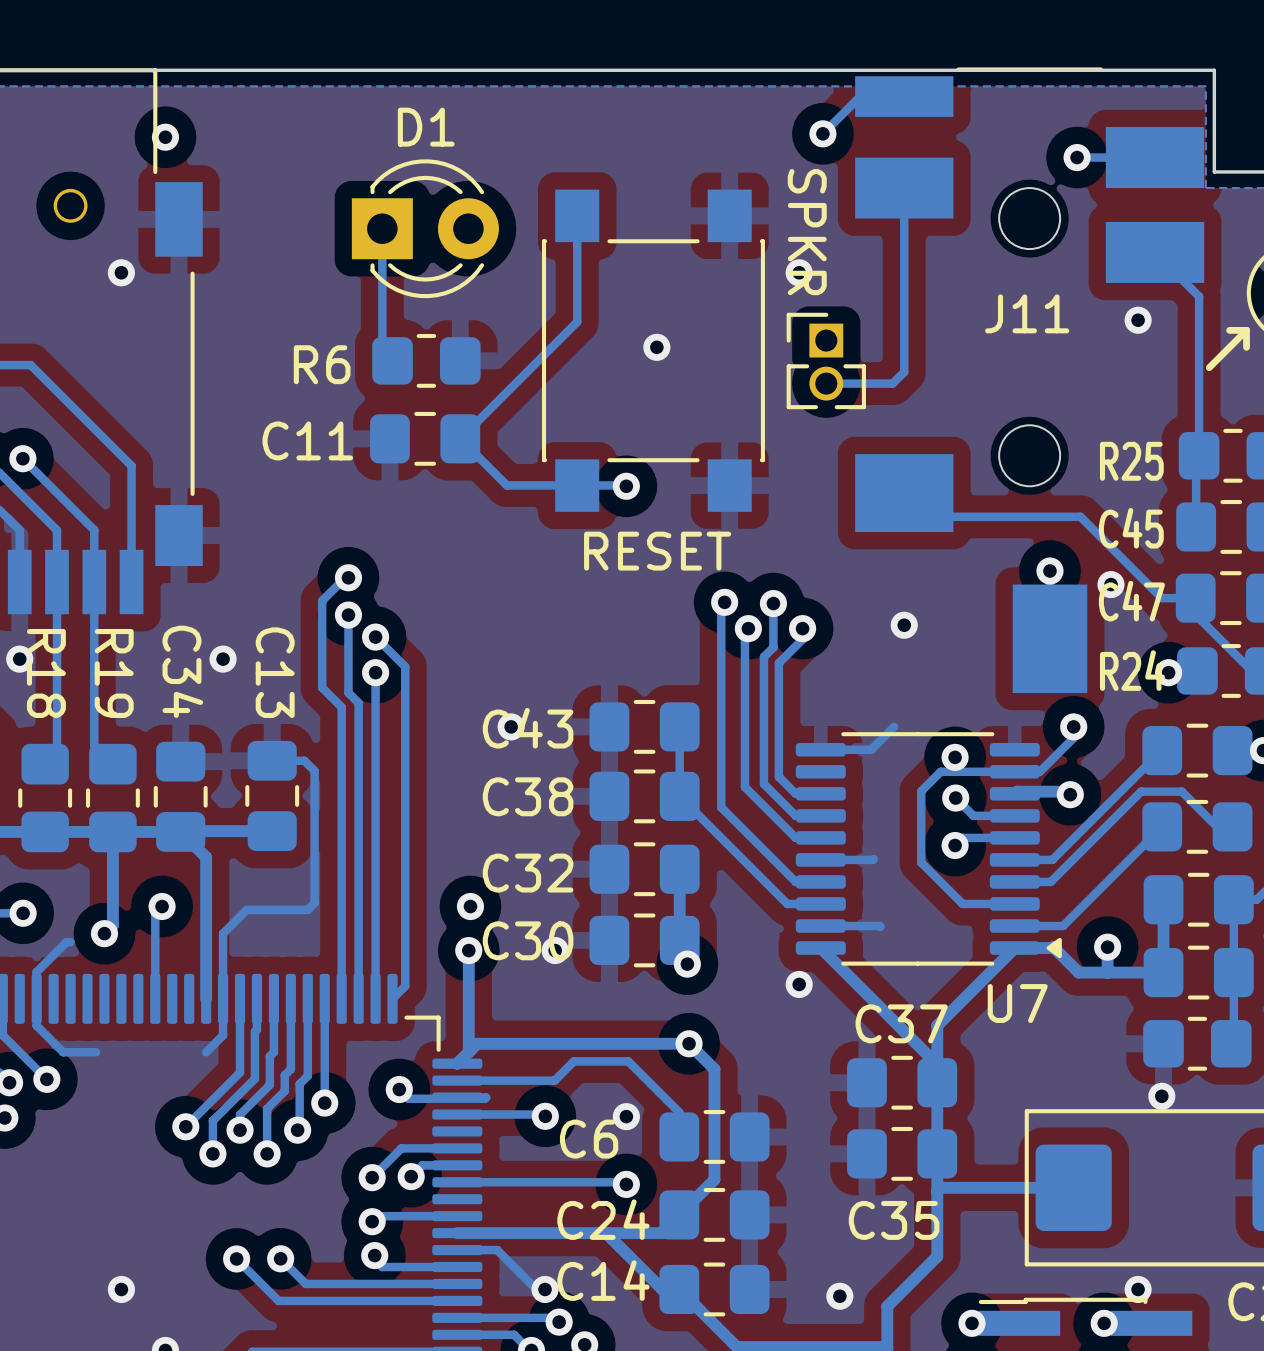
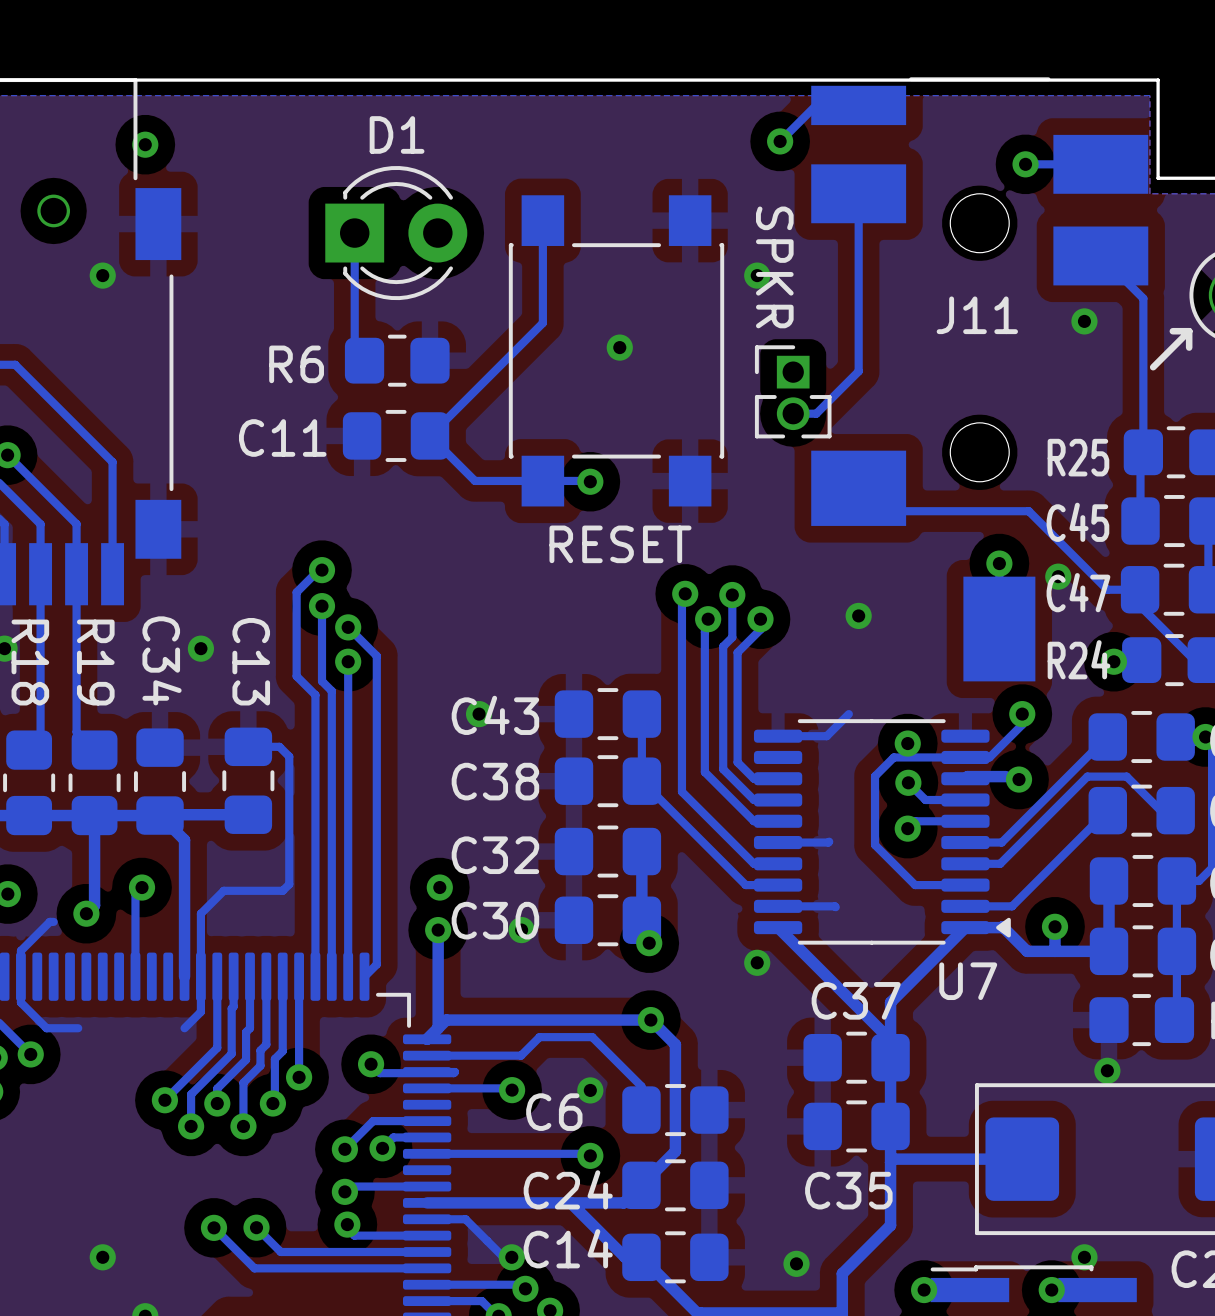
part position: (826, 360) -> (793, 391)
bottom track: (892, 383) (826, 383) -> (847, 382) (816, 413) (793, 413)

